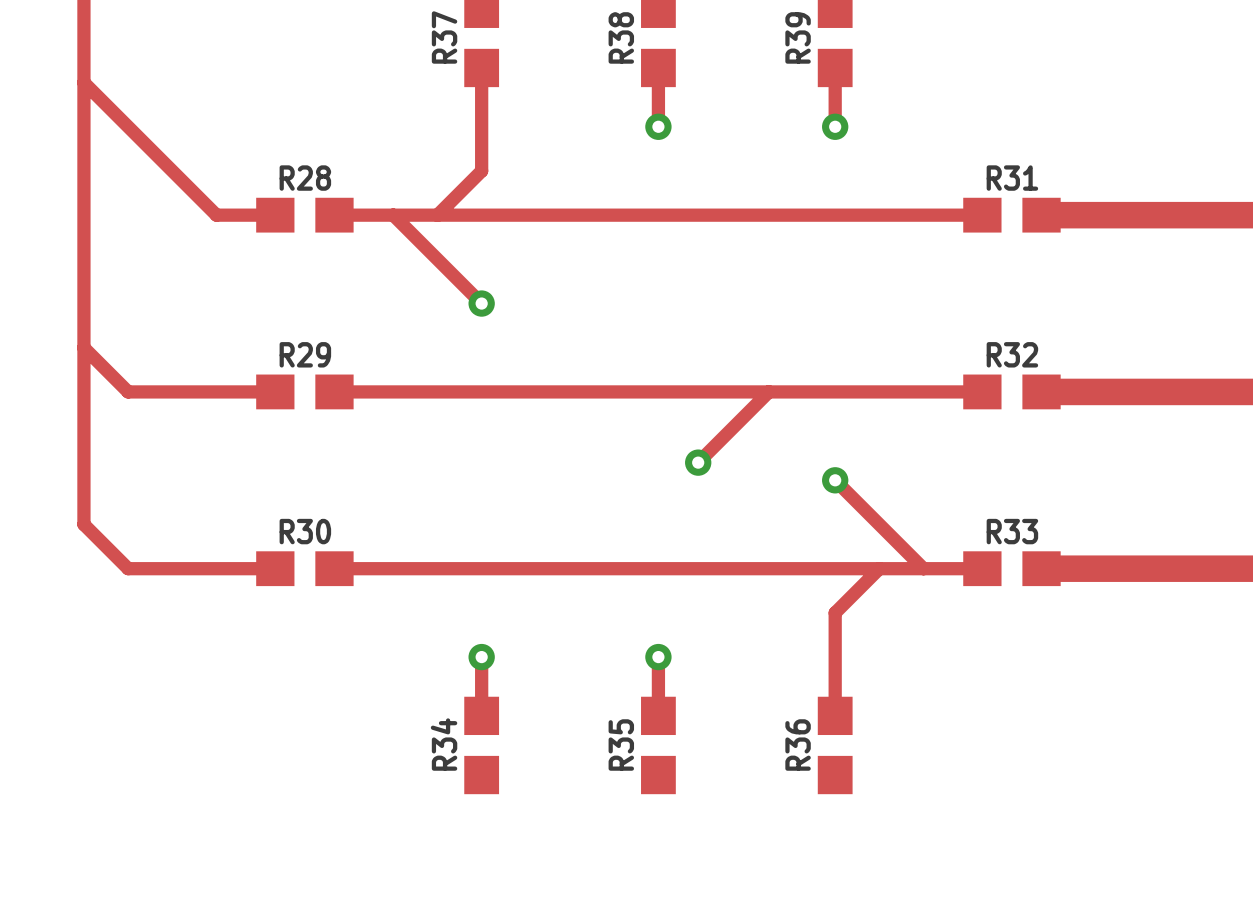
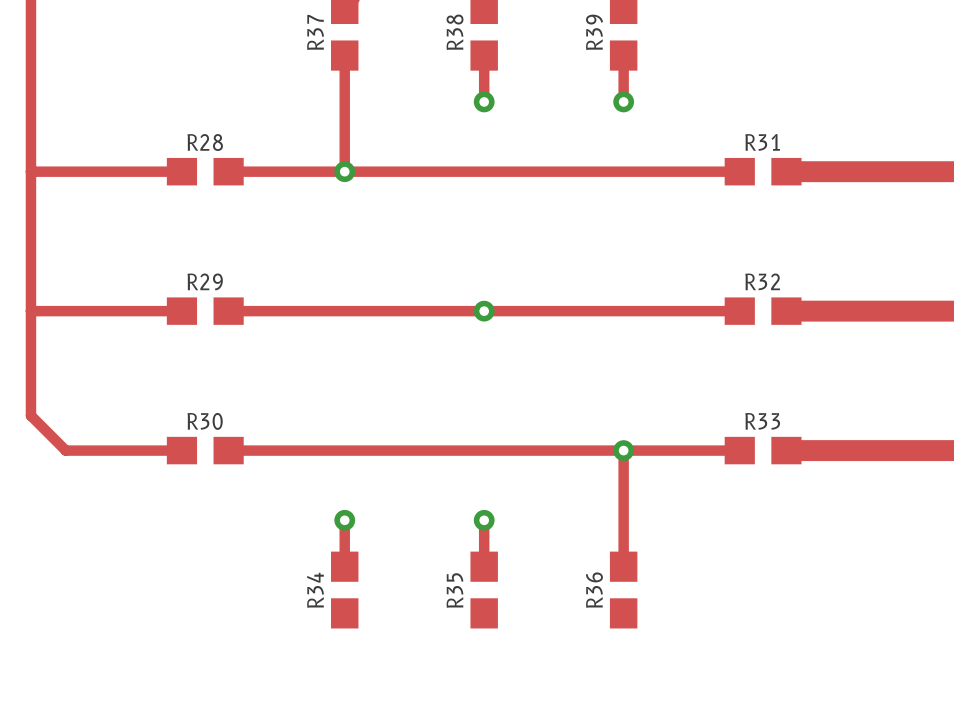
track: (83, 82) (216, 215) -> (30, 171) (135, 171)
track: (481, 170) (437, 215) -> (344, 136) (344, 171)
track: (393, 215) (481, 303) -> none
via position: (481, 303) -> (344, 171)
track: (83, 347) (128, 391) -> (30, 311) (65, 311)
track: (768, 391) (698, 462) -> none
via position: (698, 462) -> (484, 311)
track: (835, 480) (923, 568) -> none
via: (835, 480) -> none
via: none -> (623, 450)
track: (879, 568) (835, 612) -> (623, 450) (623, 485)

